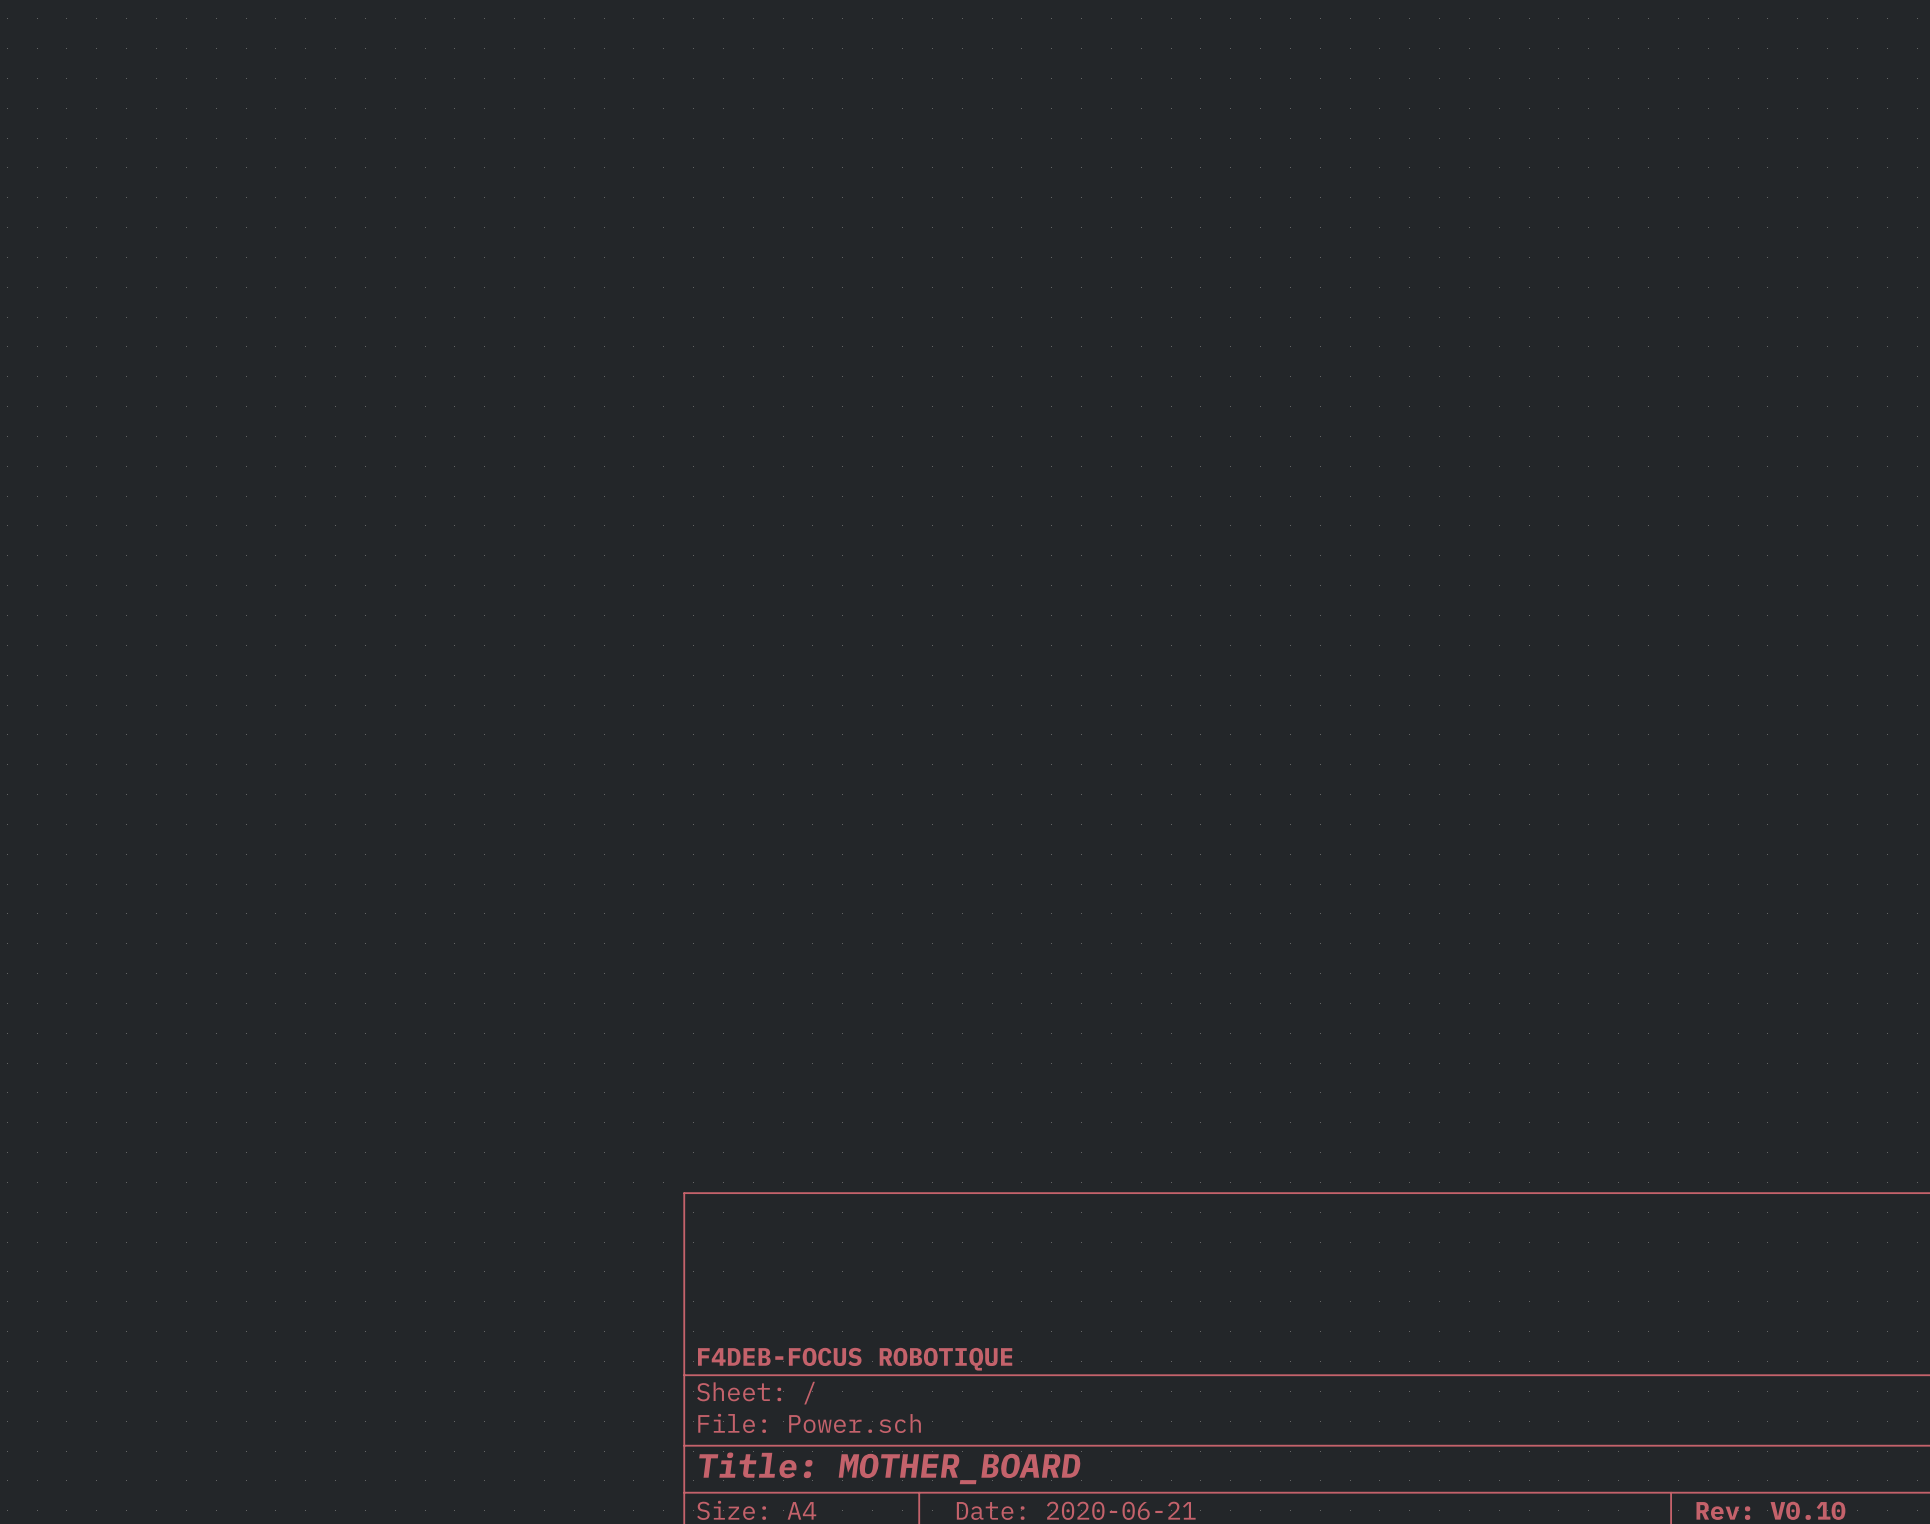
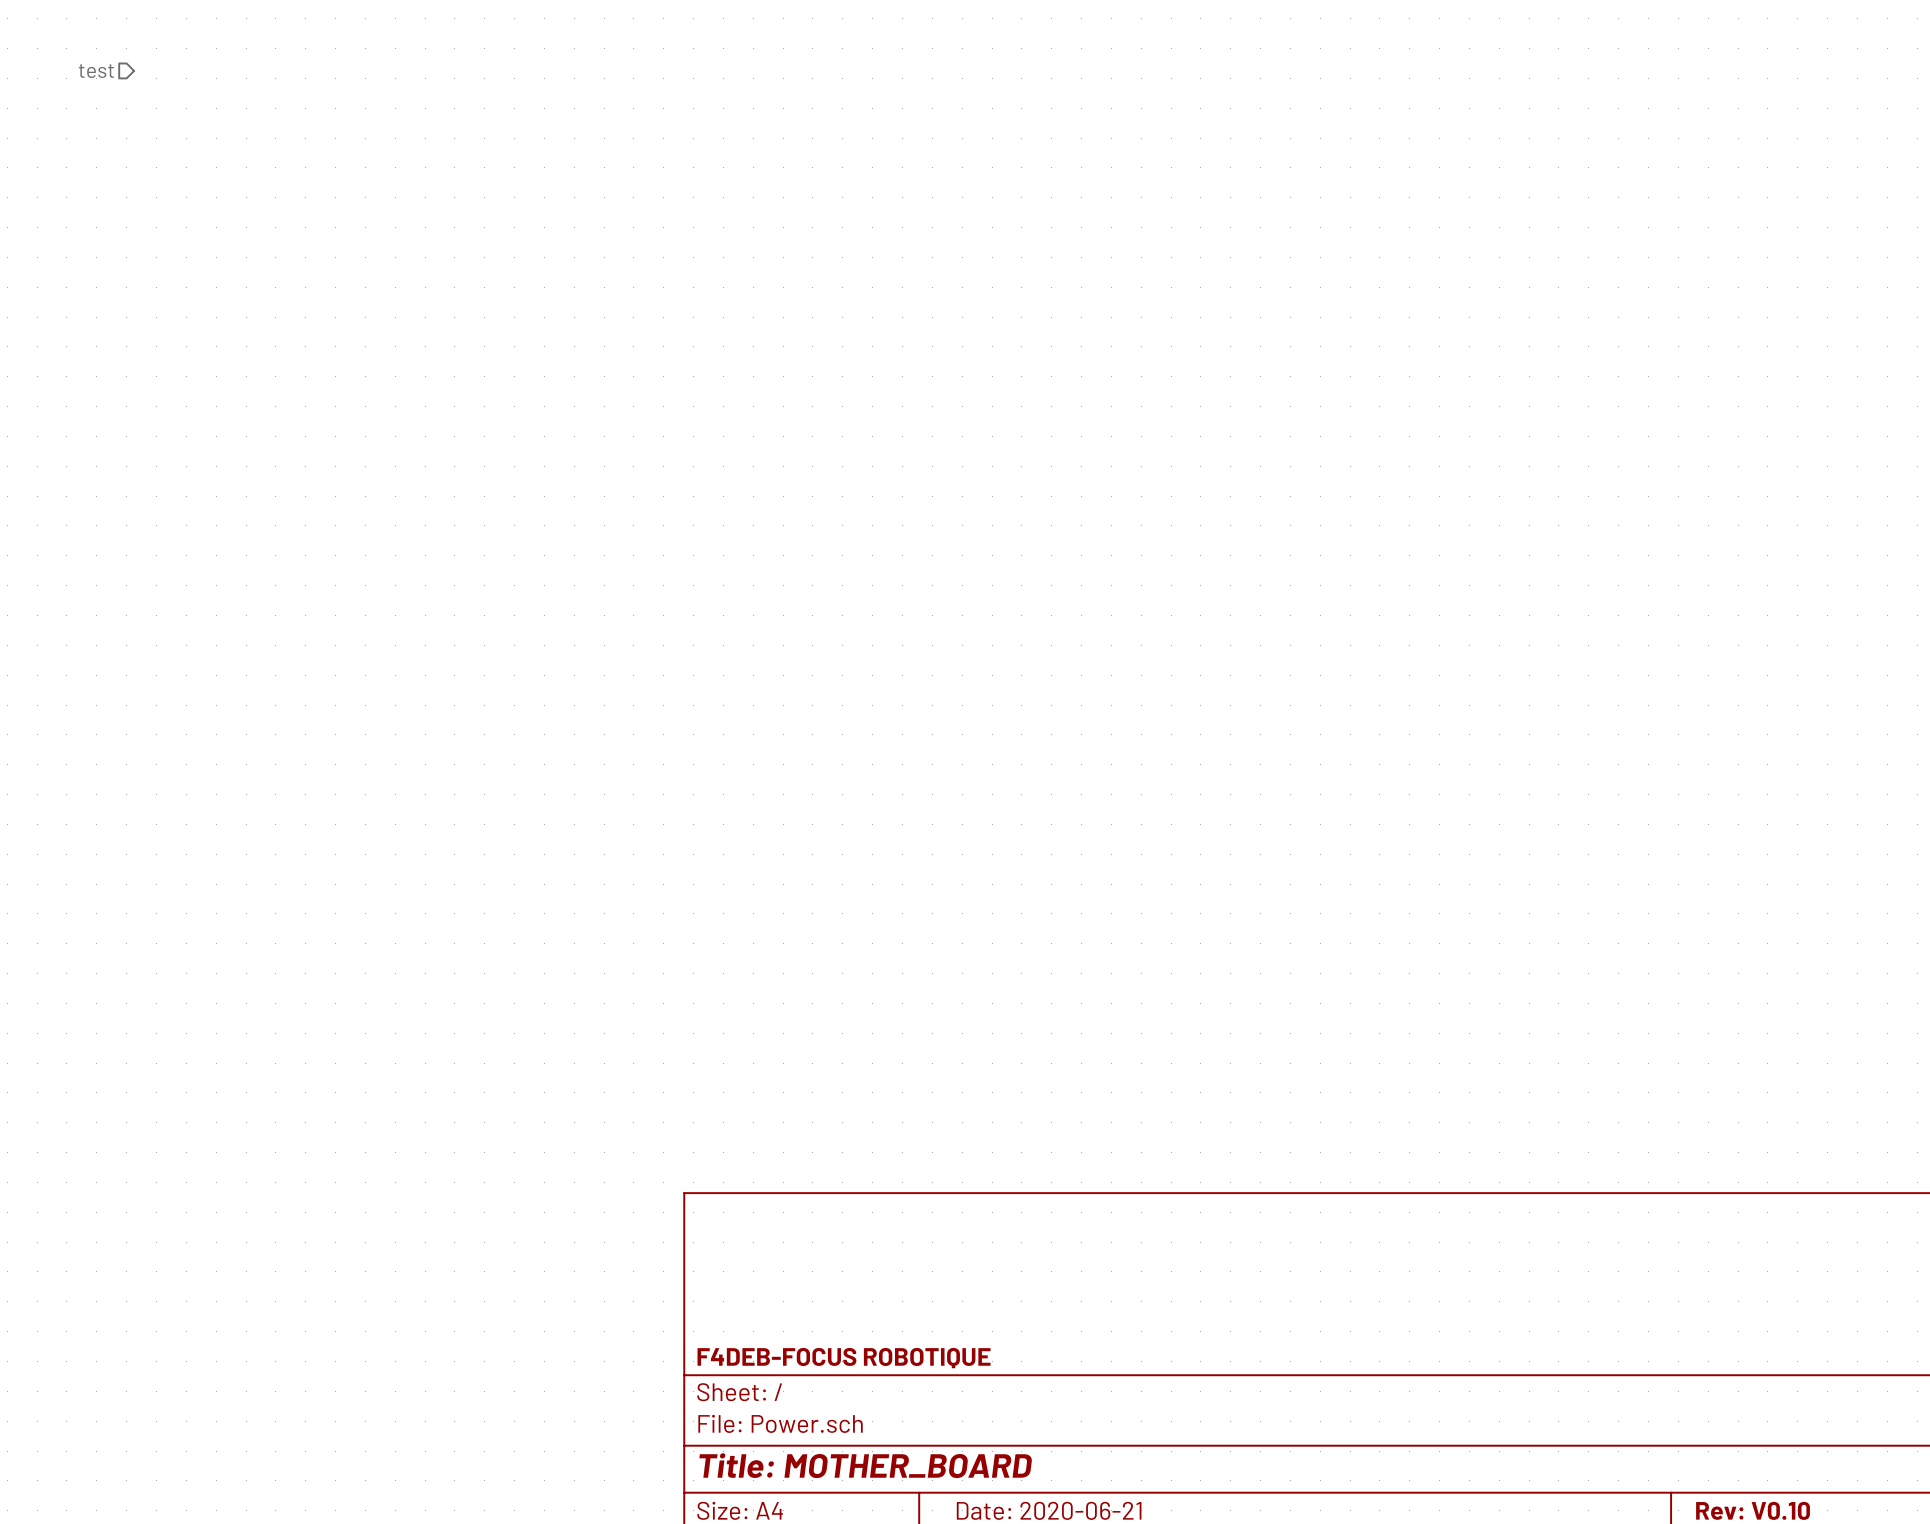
hierarchical label: none -> test (96, 71)

